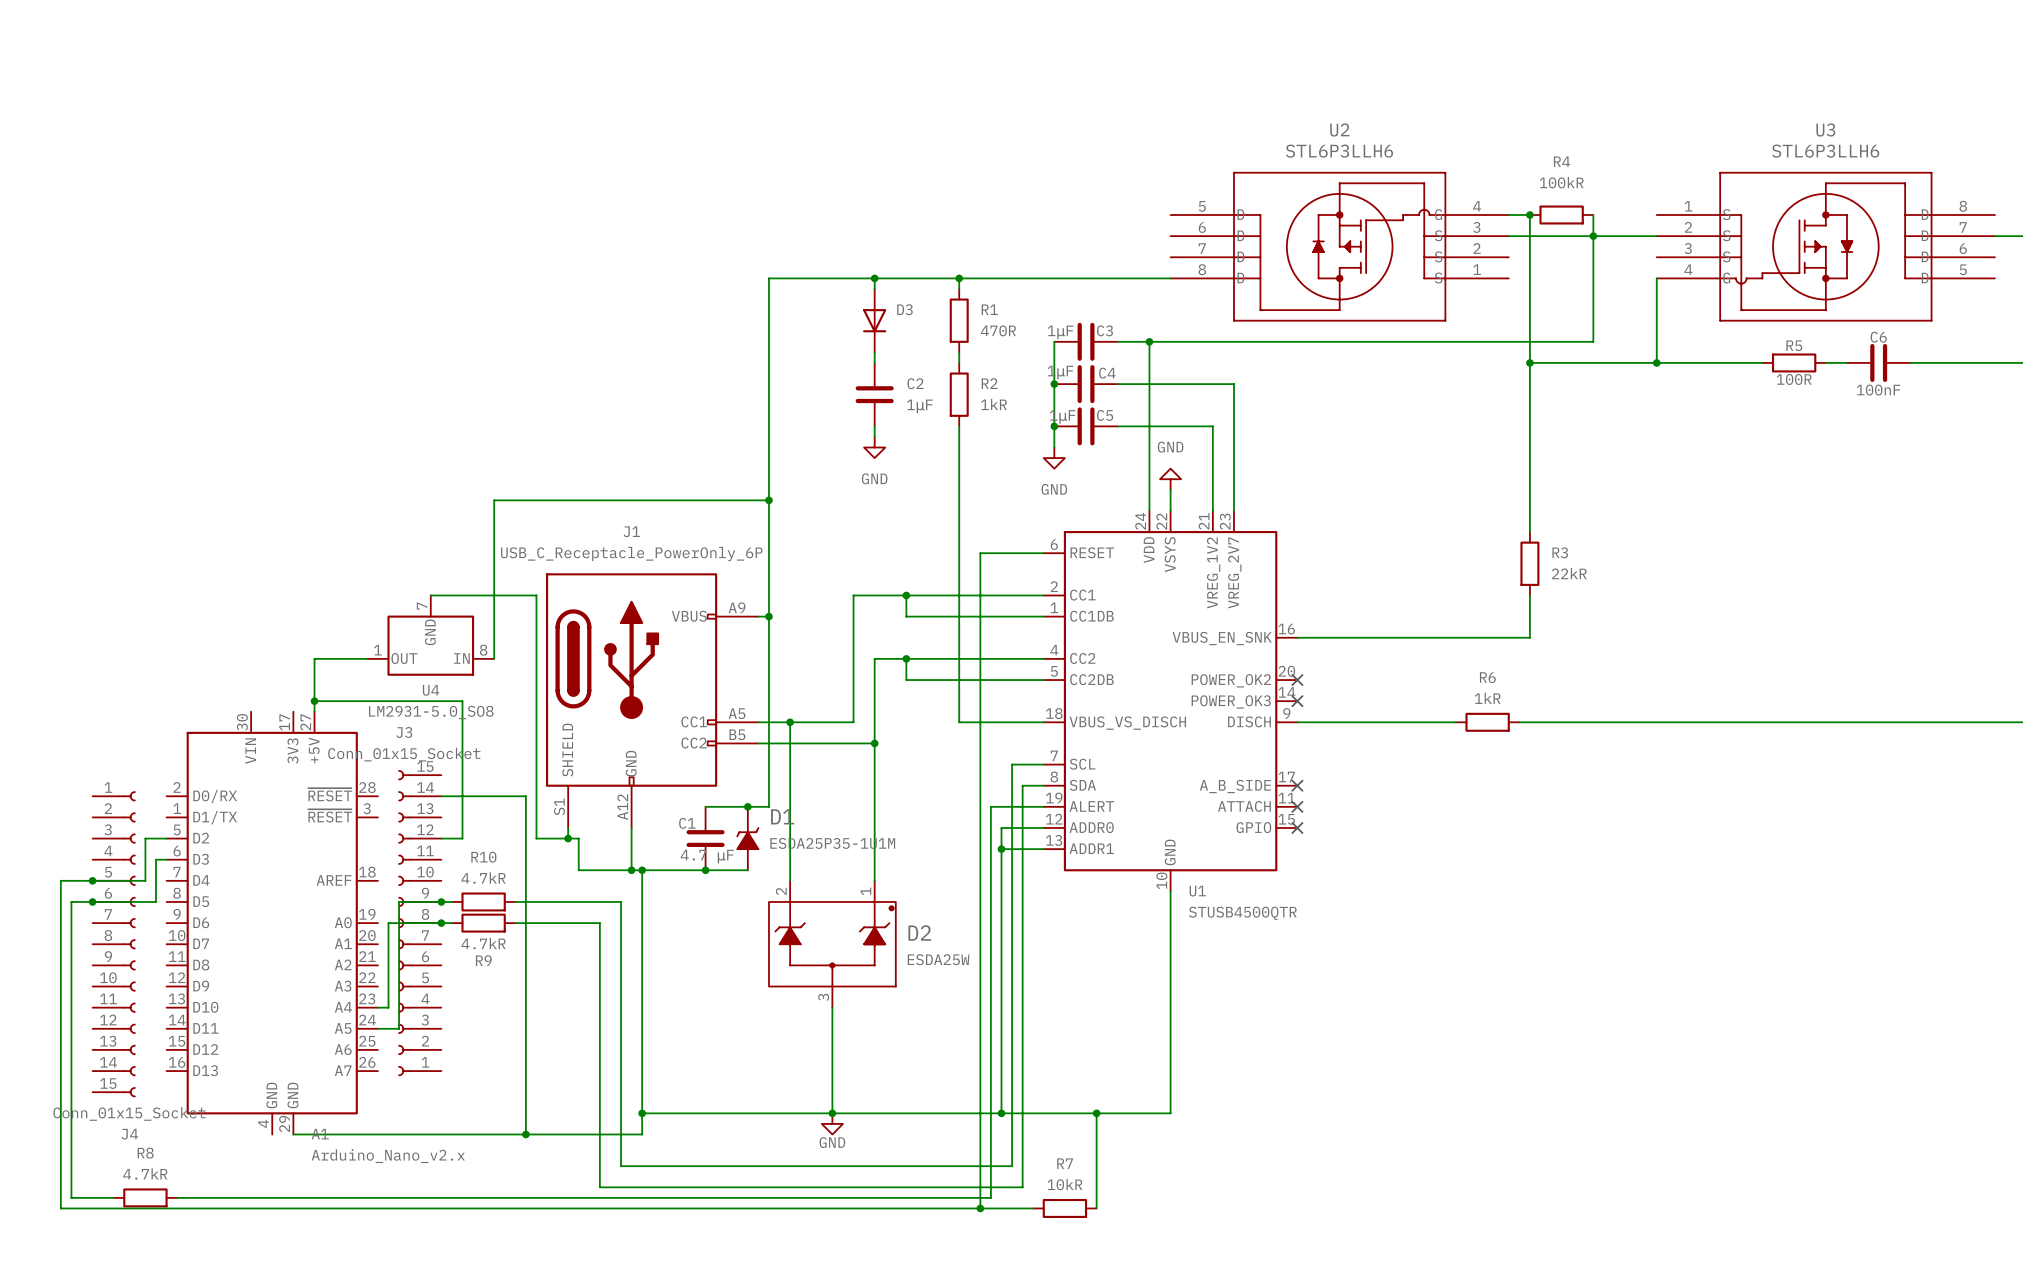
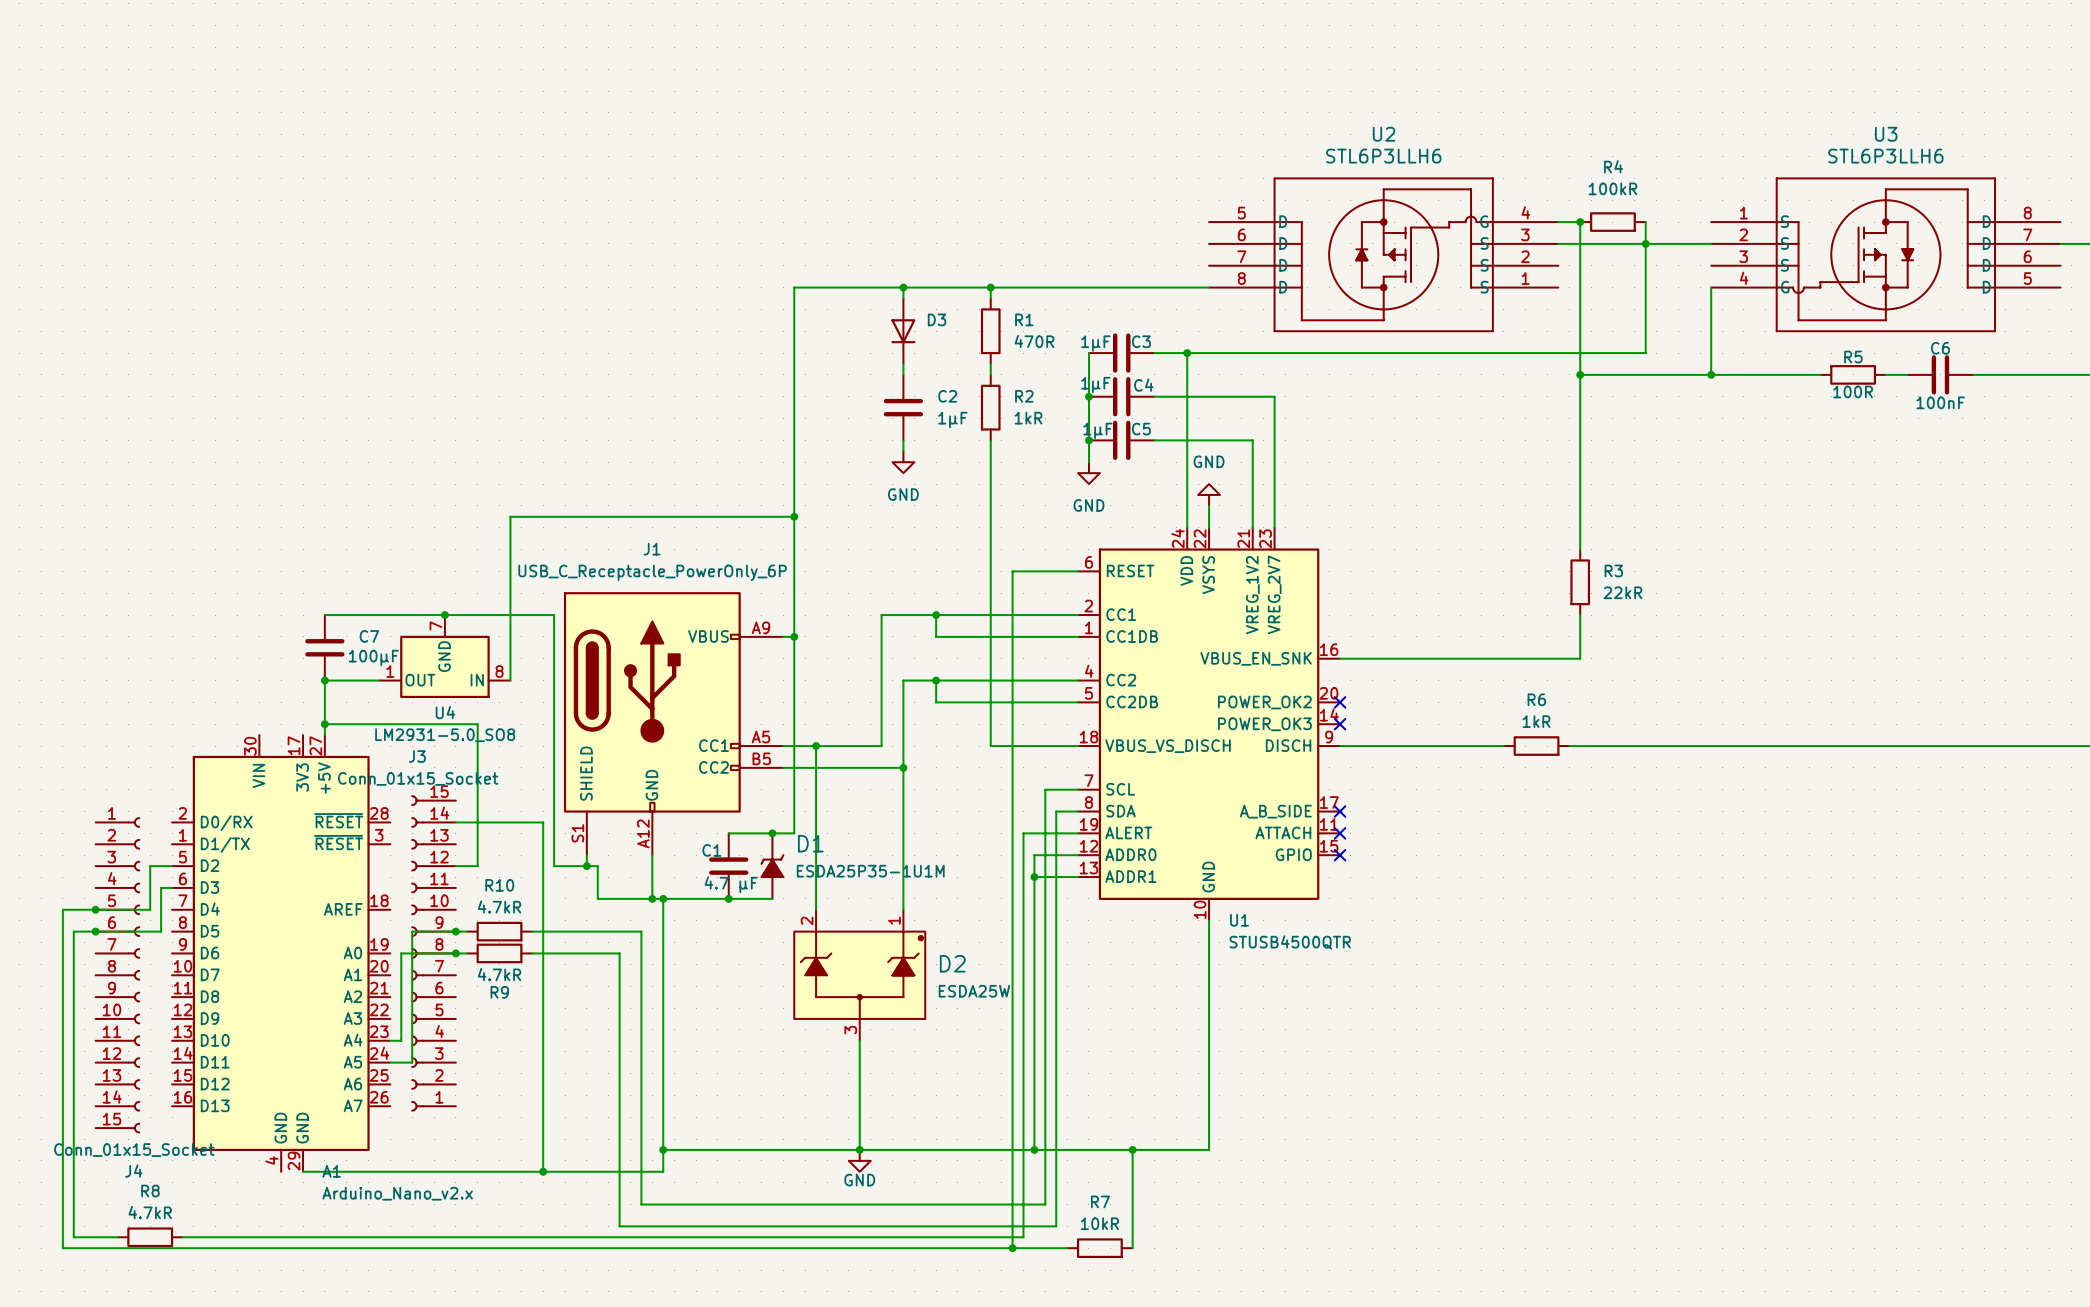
wire: none -> (324, 615) (444, 615)
junction: none -> (444, 615)
C7: none -> 100μF (324, 647)
junction: none -> (324, 680)

